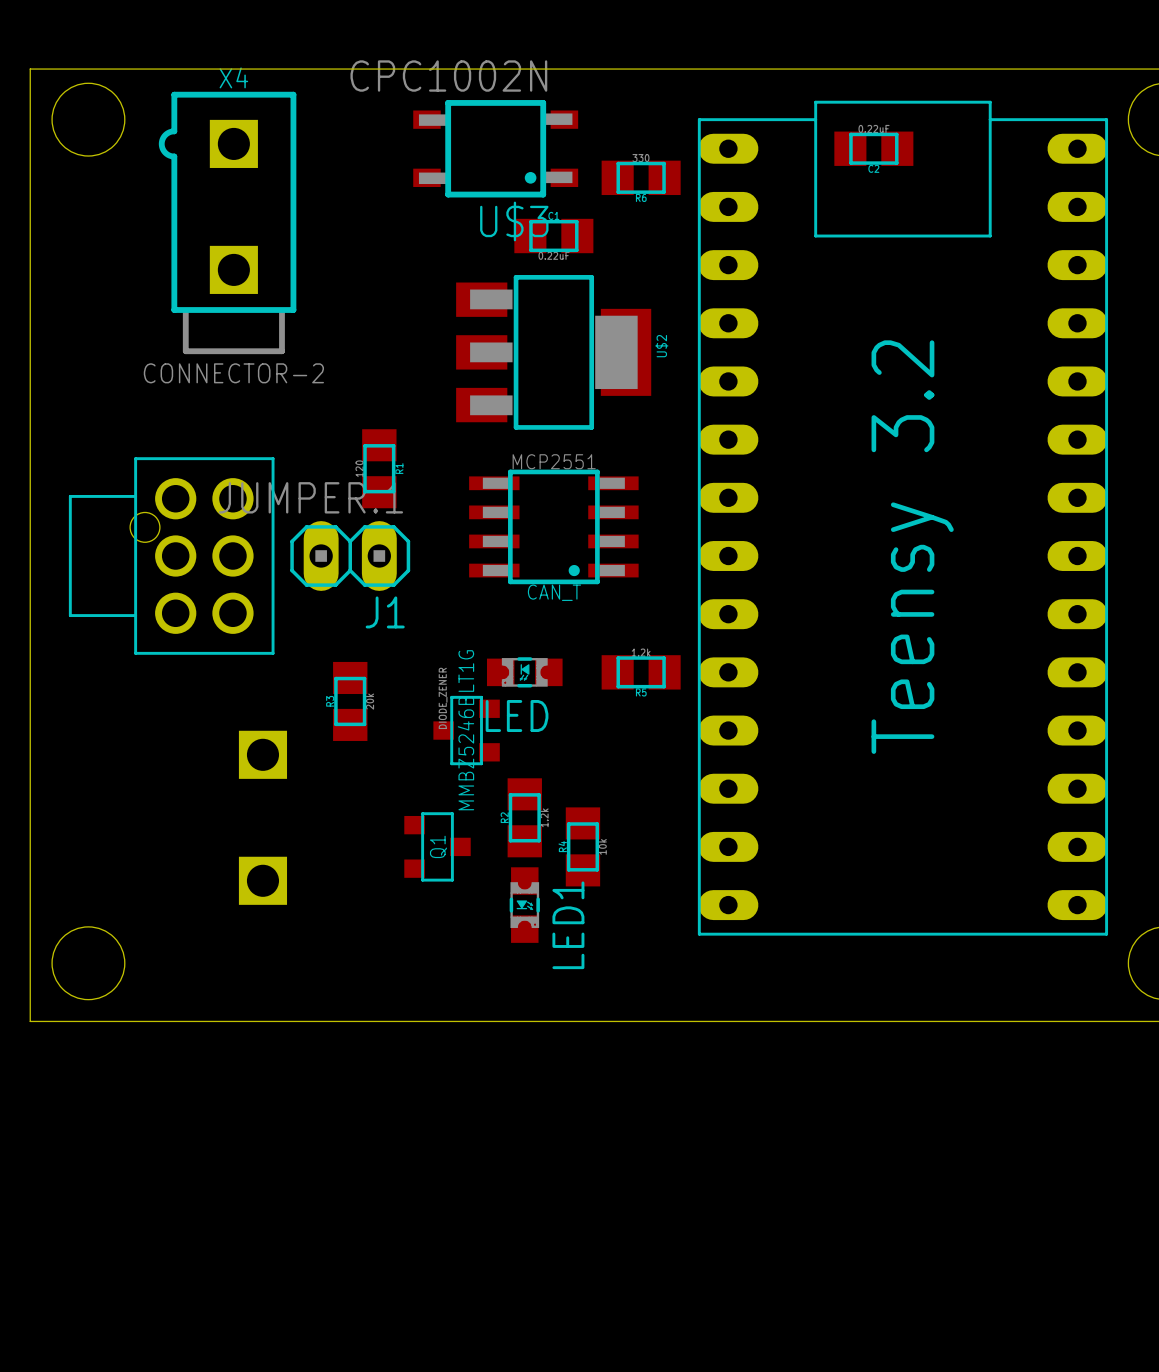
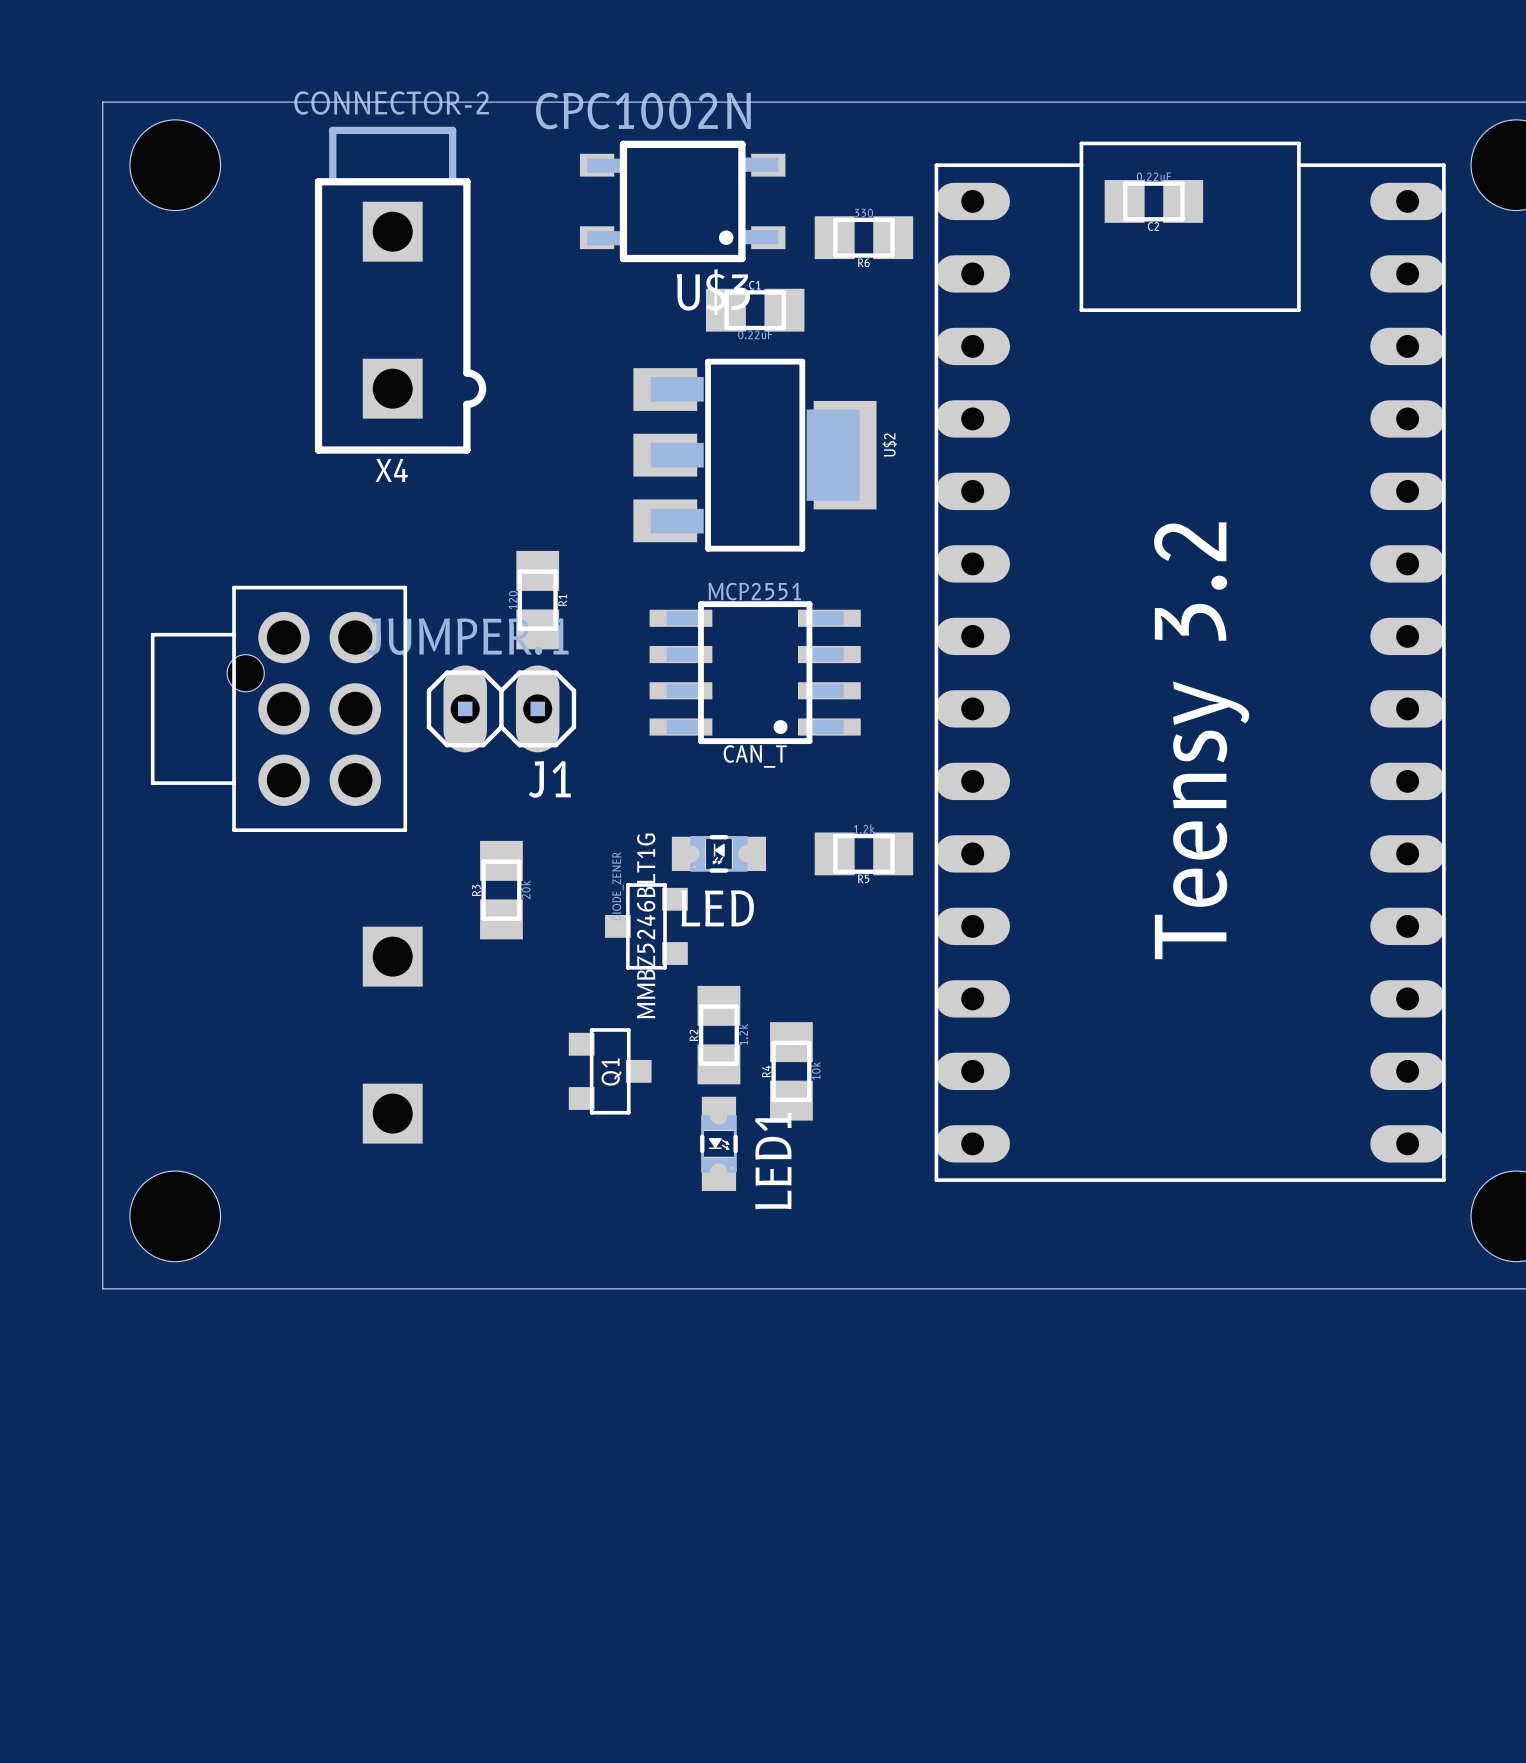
X4 rotation: 0° (227, 222) -> 180° (400, 290)

